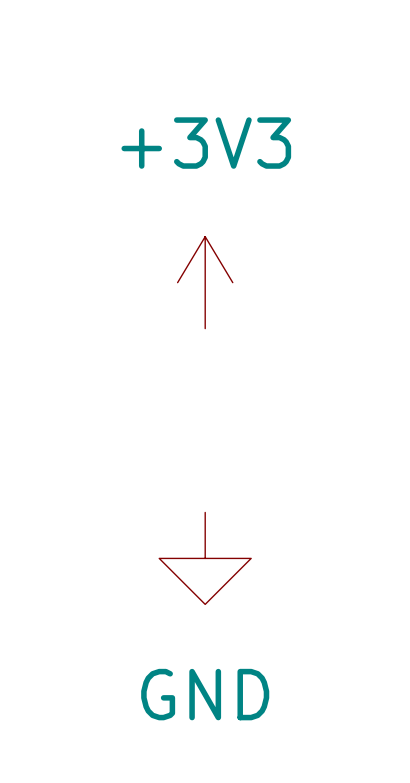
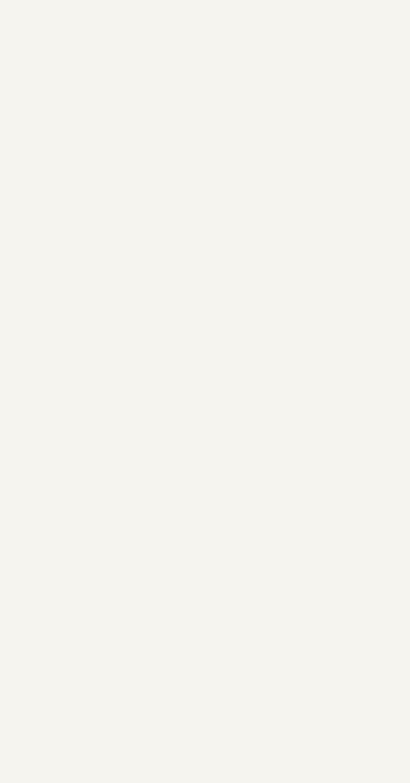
power symbol: +3V3 (205, 282) -> none
power symbol: GND (205, 558) -> none

